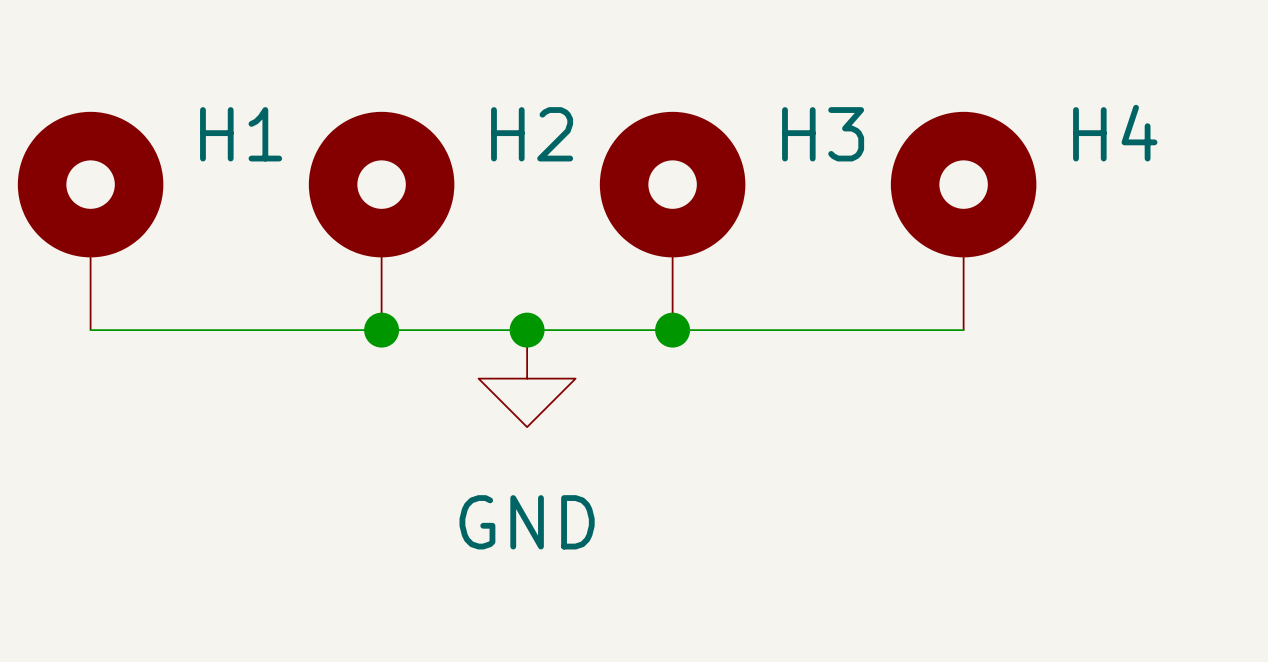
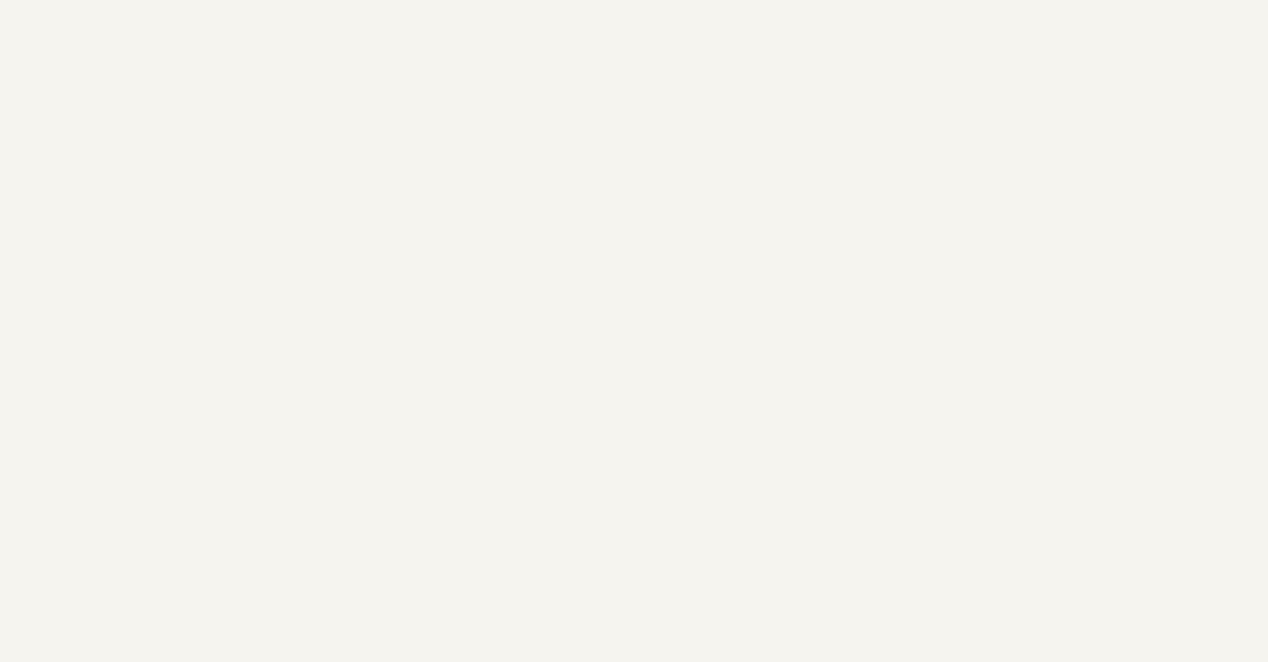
H1: (90, 220) -> none
H2: (381, 220) -> none
H3: (672, 220) -> none
H4: (963, 220) -> none
wire: (90, 330) (963, 330) -> none
junction: (381, 330) -> none
junction: (527, 330) -> none
junction: (672, 330) -> none
power symbol: GND (527, 378) -> none

